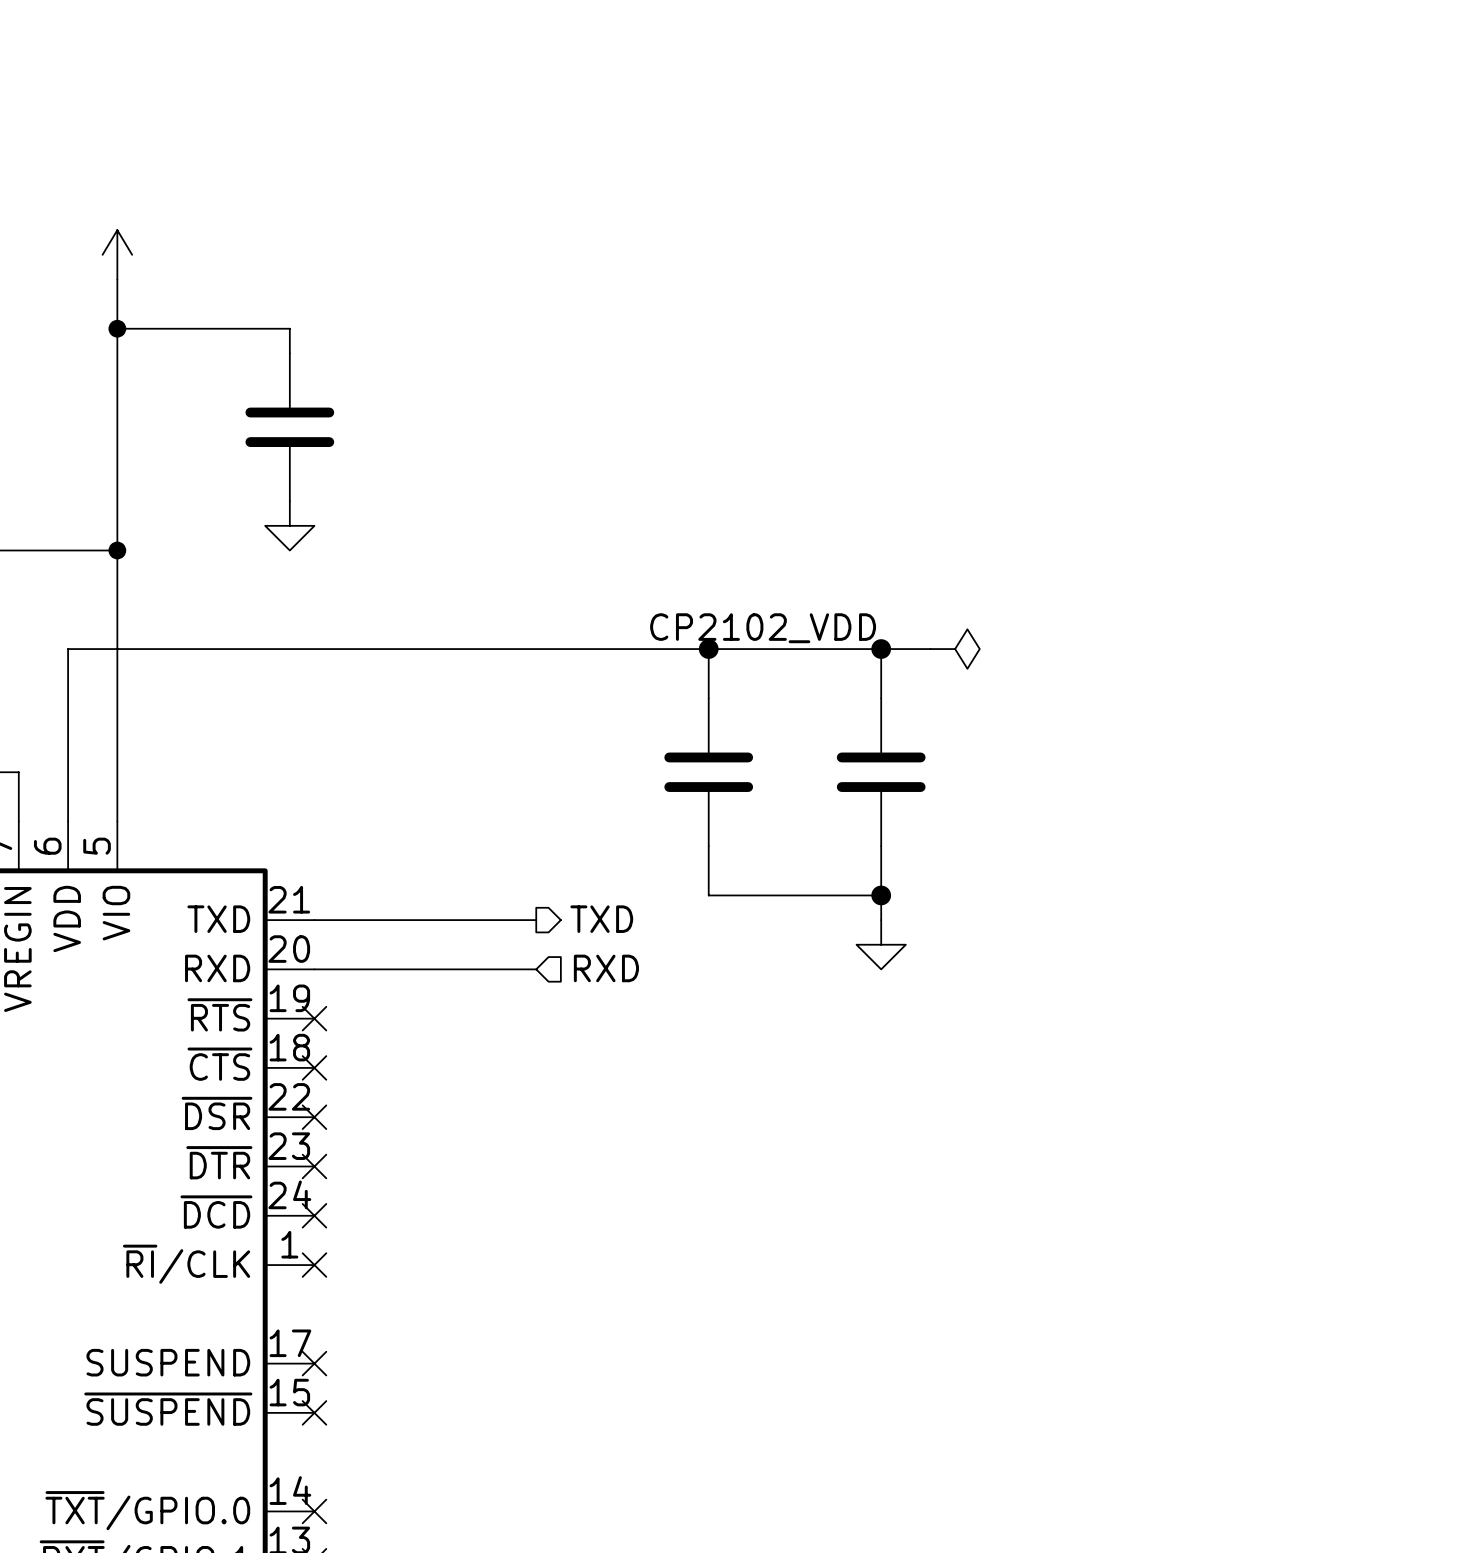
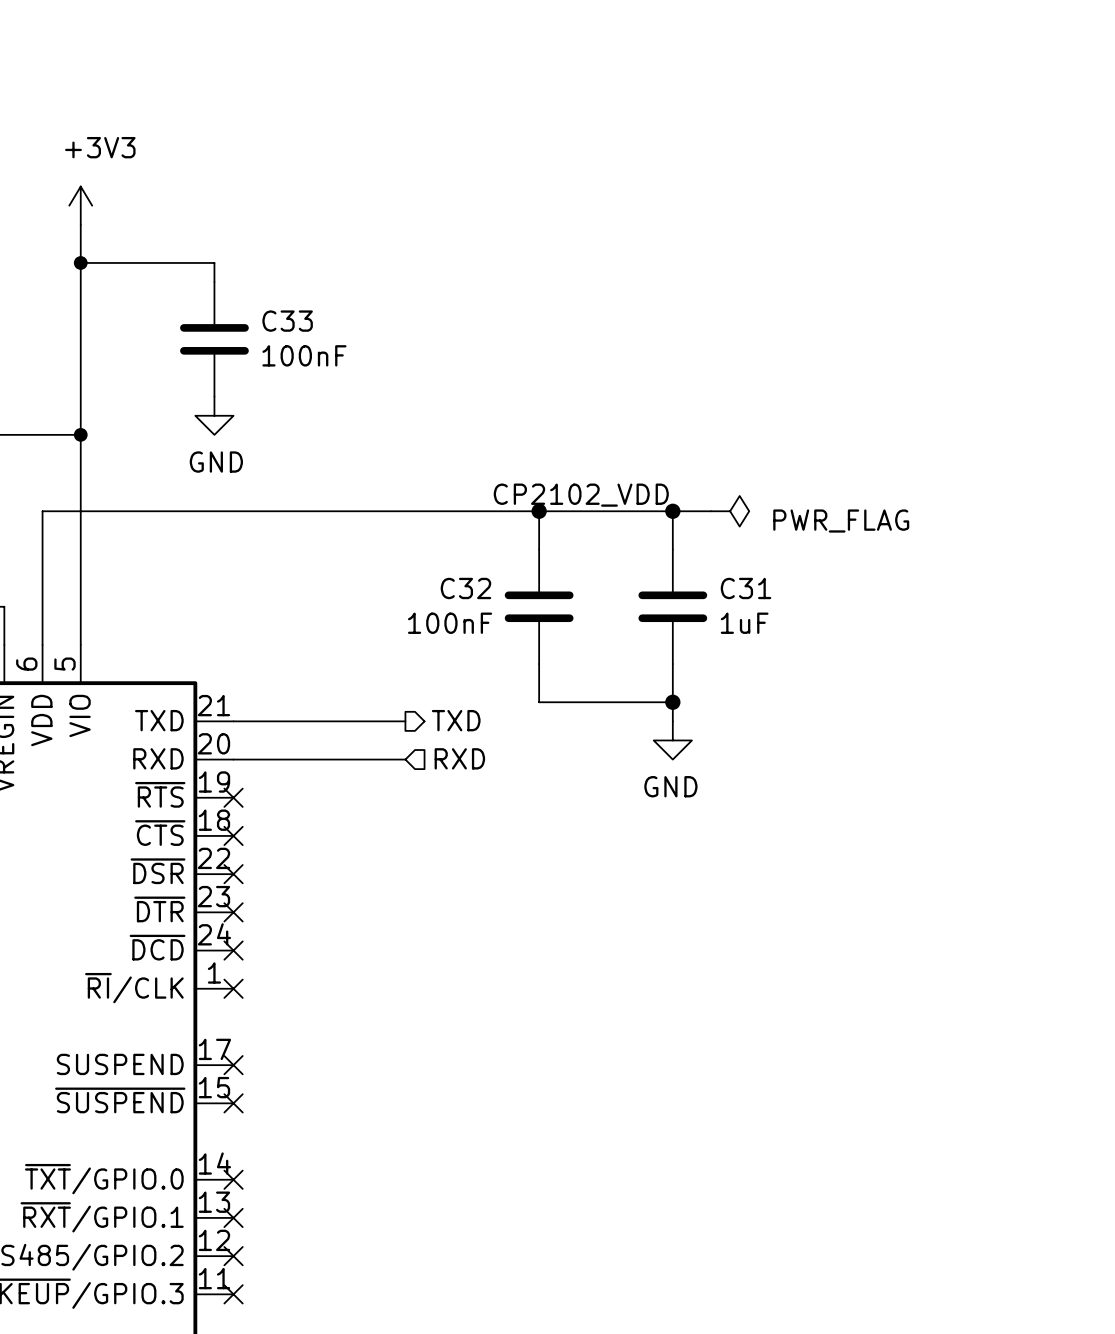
power symbol text: none -> +3V3 (100, 147)
C33 name: none -> C33 (287, 321)
C33 value: none -> 100nF (304, 355)
power symbol text: none -> GND (216, 462)
power symbol text: none -> PWR_FLAG (841, 521)
C32 name: none -> C32 (465, 588)
C31 name: none -> C31 (746, 588)
C32 value: none -> 100nF (450, 623)
C31 value: none -> 1uF (744, 623)
power symbol text: none -> GND (670, 786)

